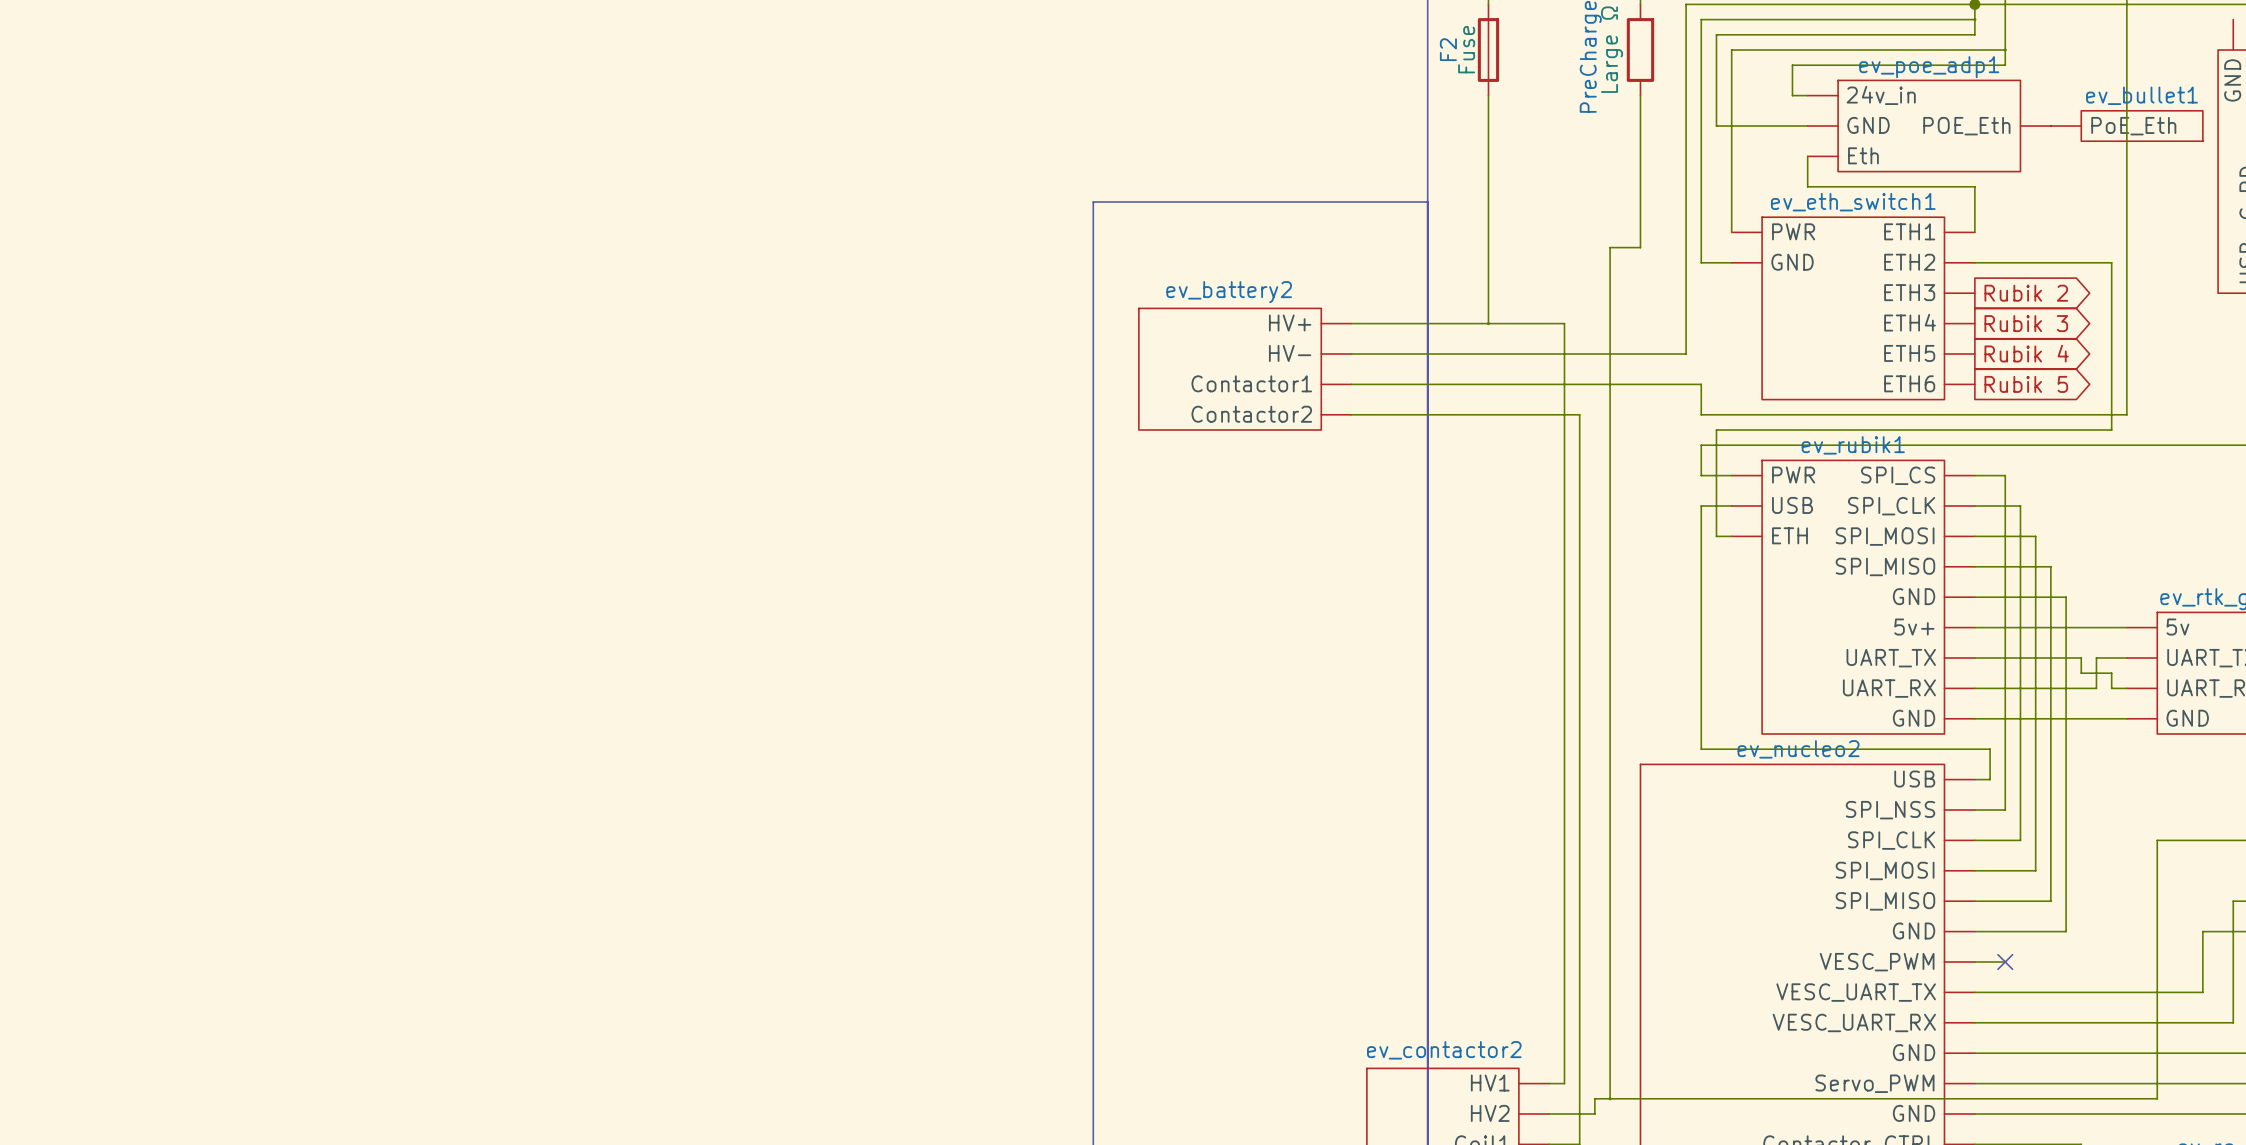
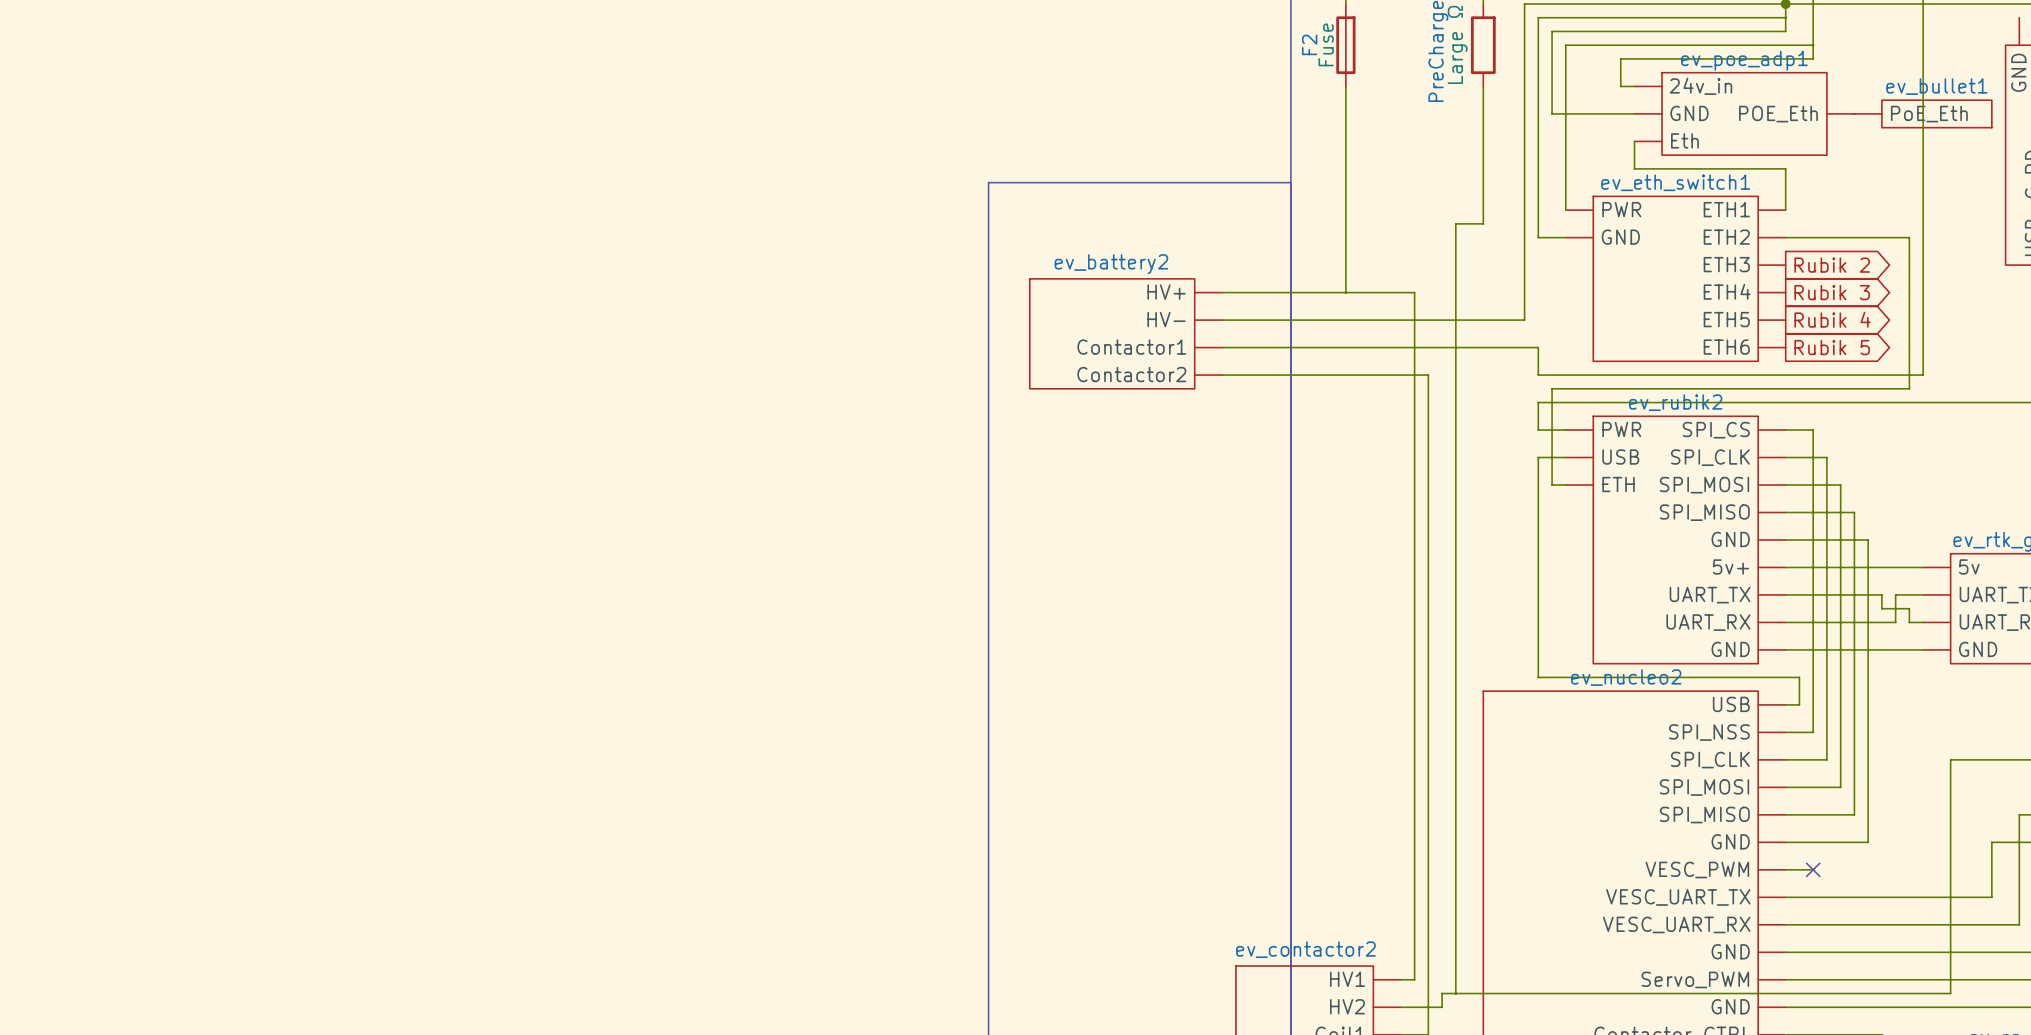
ev_rubik1 name: ev_rubik1 (1853, 445) -> ev_rubik2 (1675, 402)

